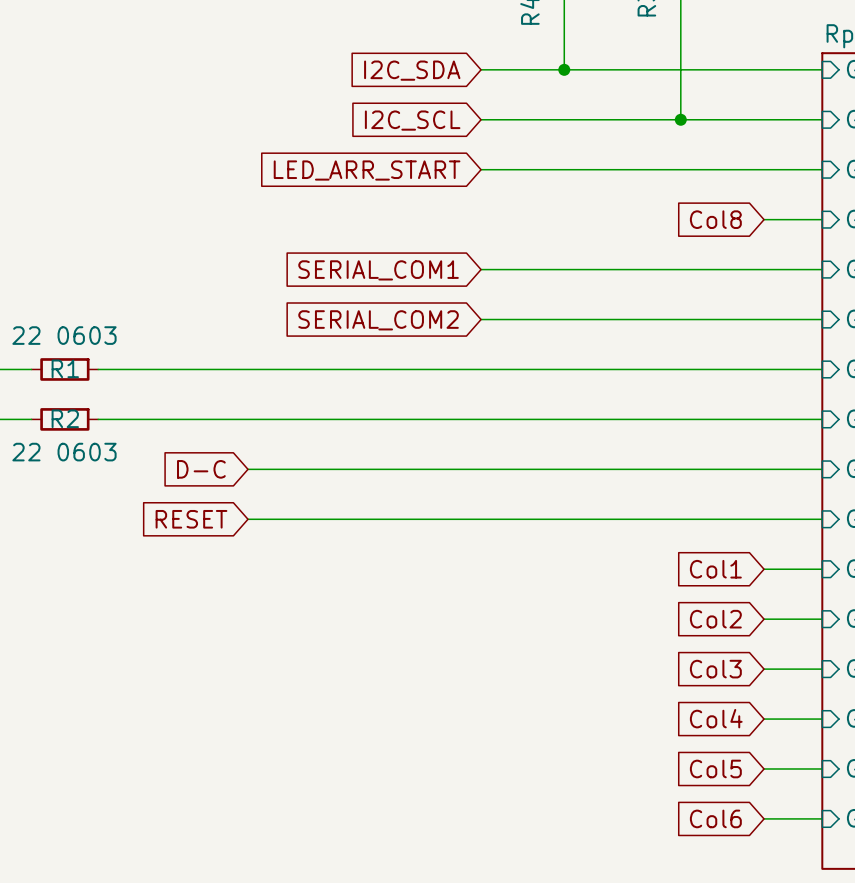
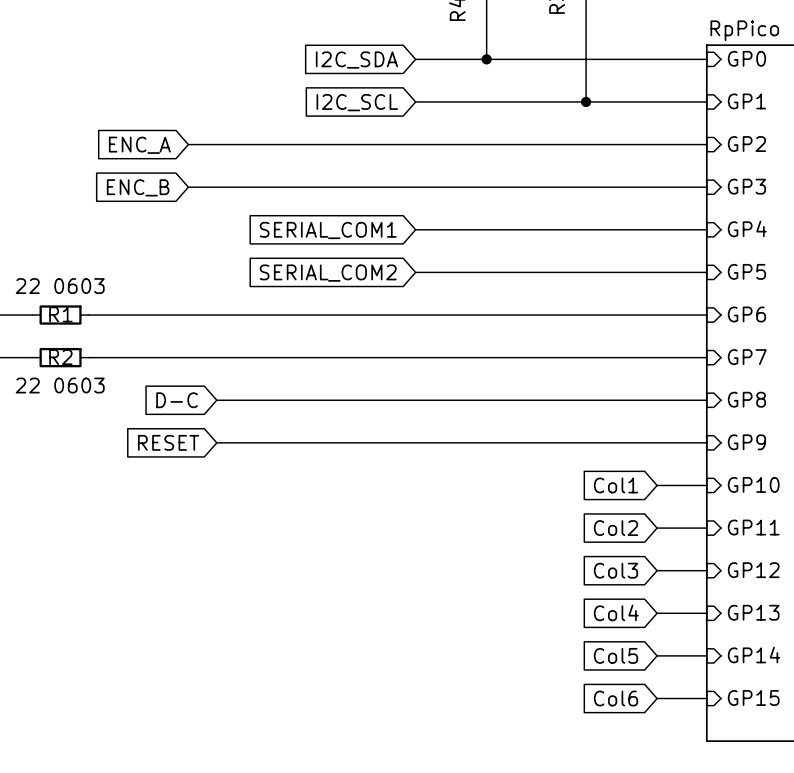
wire: none -> (188, 144) (415, 144)
global label: none -> ENC_A (139, 145)
global label: LED_ARR_START (367, 170) -> none
wire: none -> (188, 187) (657, 187)
global label: Col8 (715, 219) -> none
global label: none -> ENC_B (138, 187)

